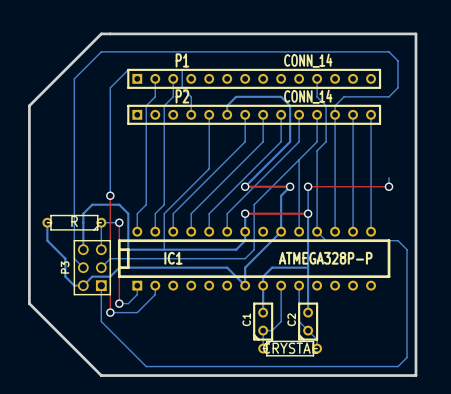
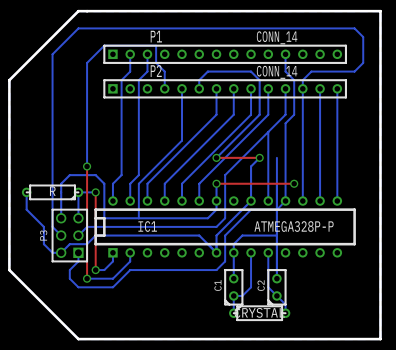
bottom track: (389, 177) (389, 186) -> none
top track: (308, 186) (389, 186) -> none
via: (308, 186) -> none
via: (389, 186) -> none
top track: none -> (276, 183) (294, 183)
via: (308, 213) -> none
via: none -> (294, 183)
bottom track: (317, 231) (326, 240) (398, 240) (407, 249) (407, 357) (398, 366) (146, 366) (101, 321) (101, 294) -> (285, 201) (276, 209) (251, 209) (225, 235) (225, 261) (216, 270) (130, 270) (112, 287) (78, 287) (69, 278) (69, 270) (78, 261)

